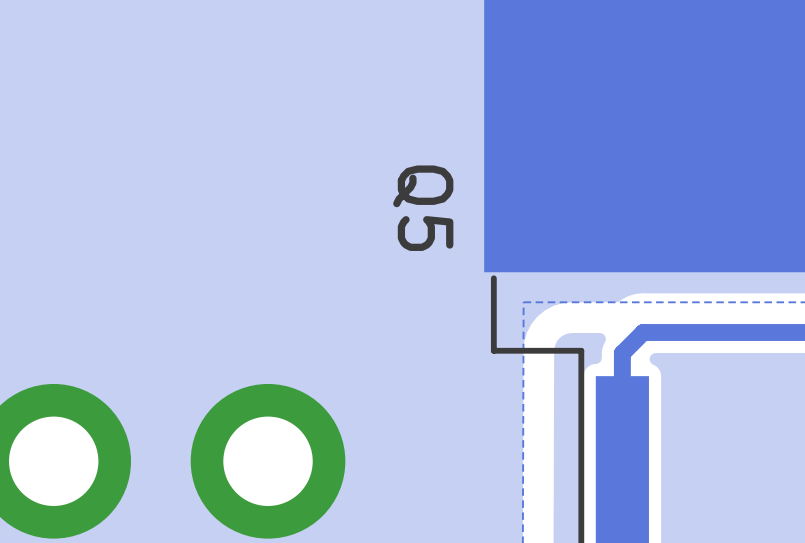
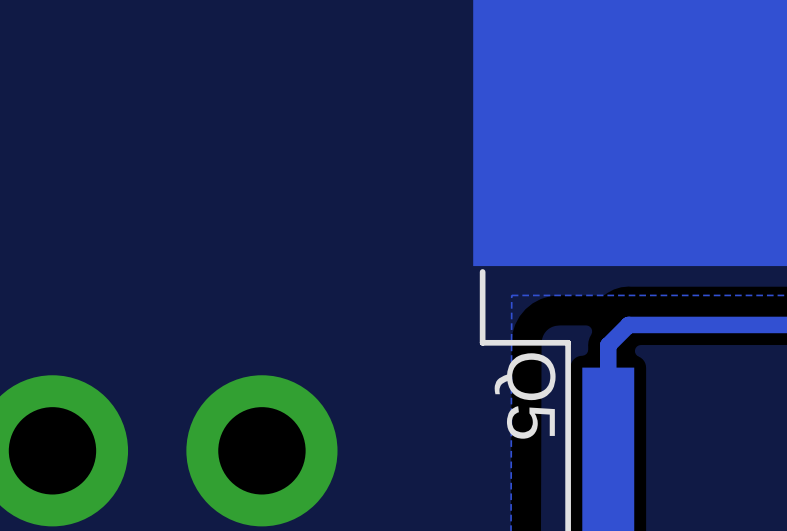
Q5 name position: Q5 (423, 208) -> Q5 (525, 395)

